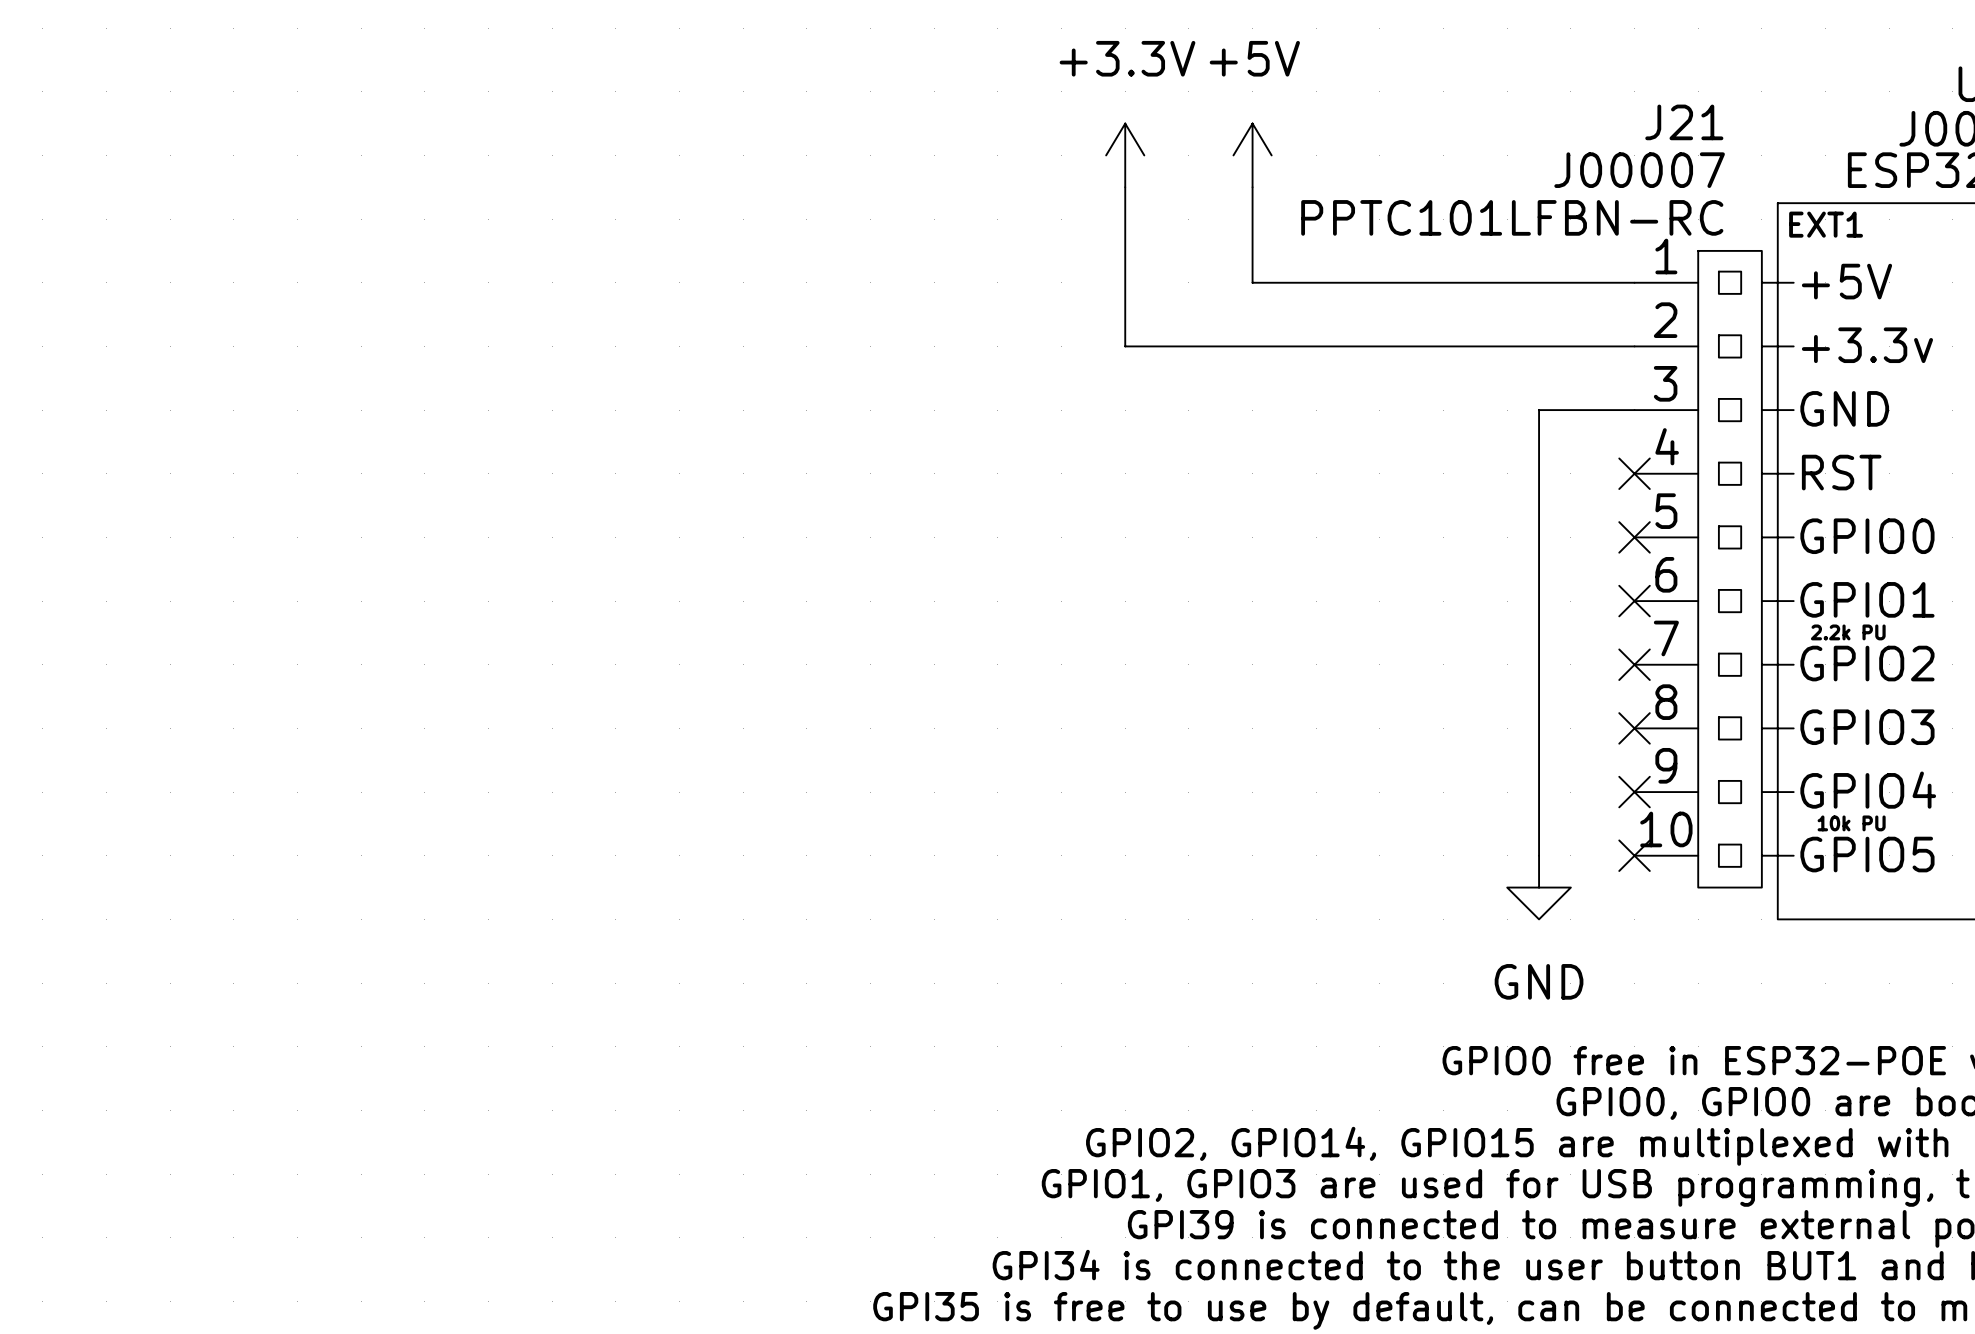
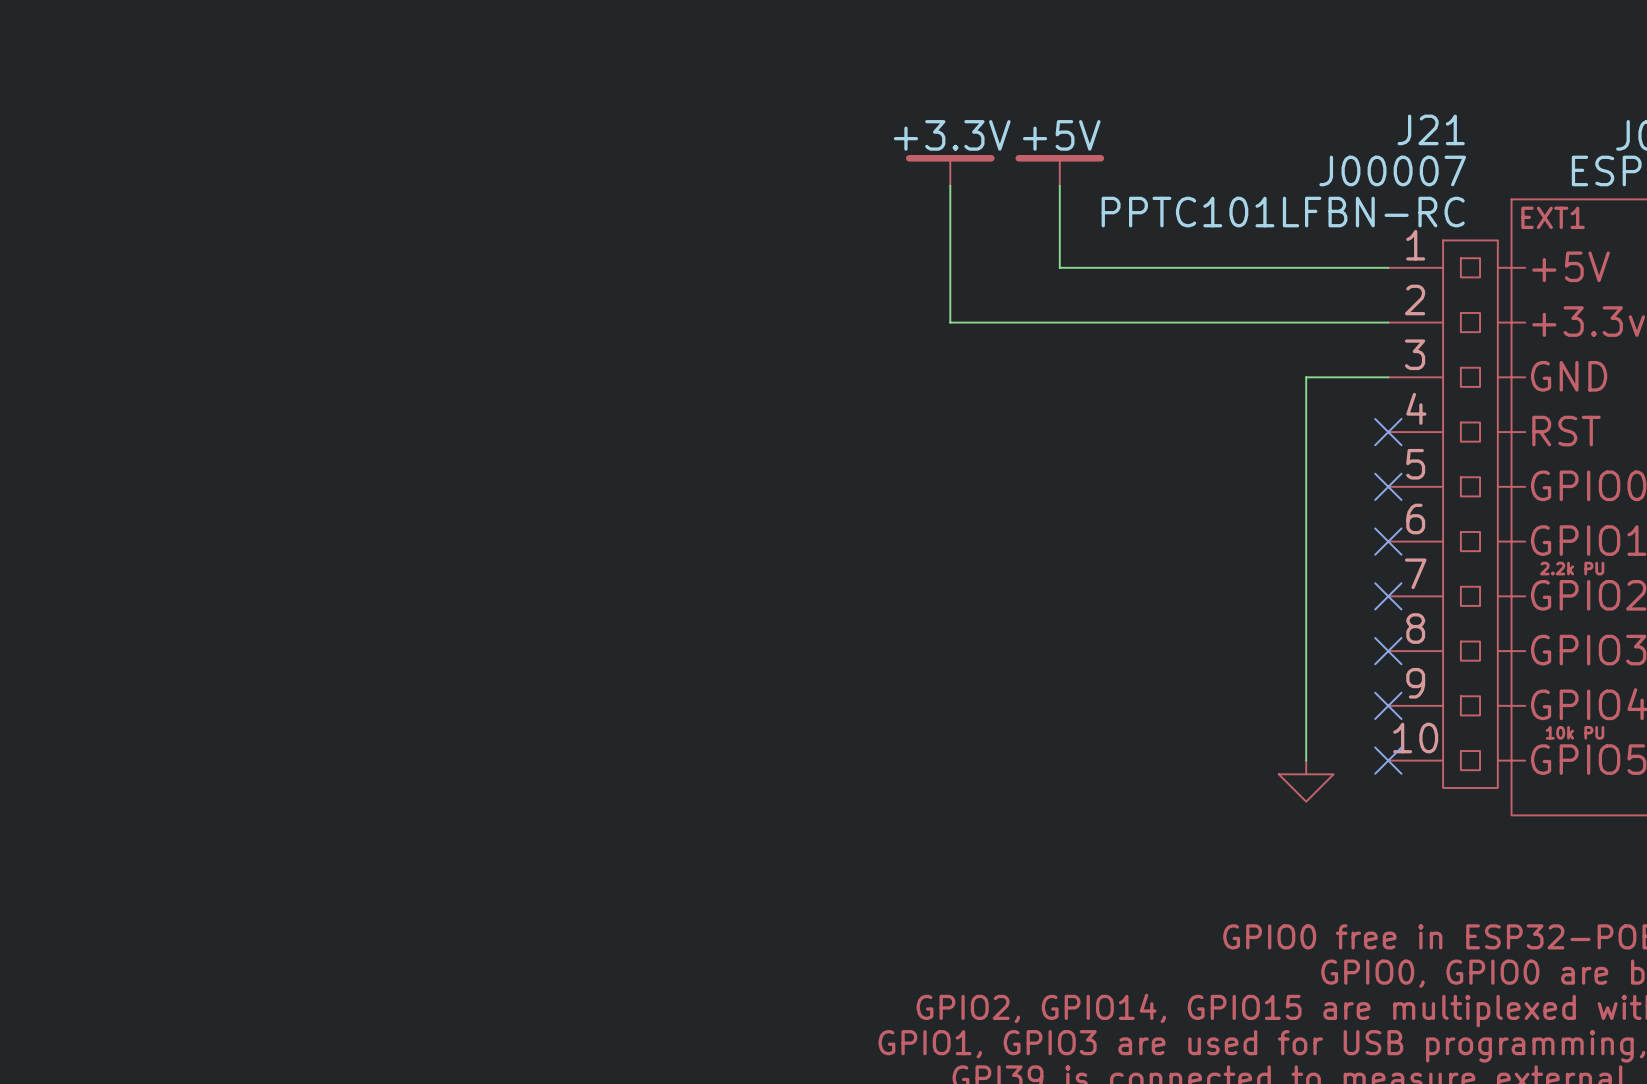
power symbol text position: +3.3V (1127, 58) -> +3.3V (952, 135)
power symbol text position: +5V (1254, 58) -> +5V (1061, 135)
power symbol shape: [1106, 123, 1145, 188] -> [905, 155, 995, 186]
power symbol shape: [1233, 123, 1272, 188] -> [1015, 155, 1105, 186]
power symbol shape: [1507, 855, 1571, 920] -> [1278, 760, 1334, 802]
power symbol text: GND (1539, 981) -> none

